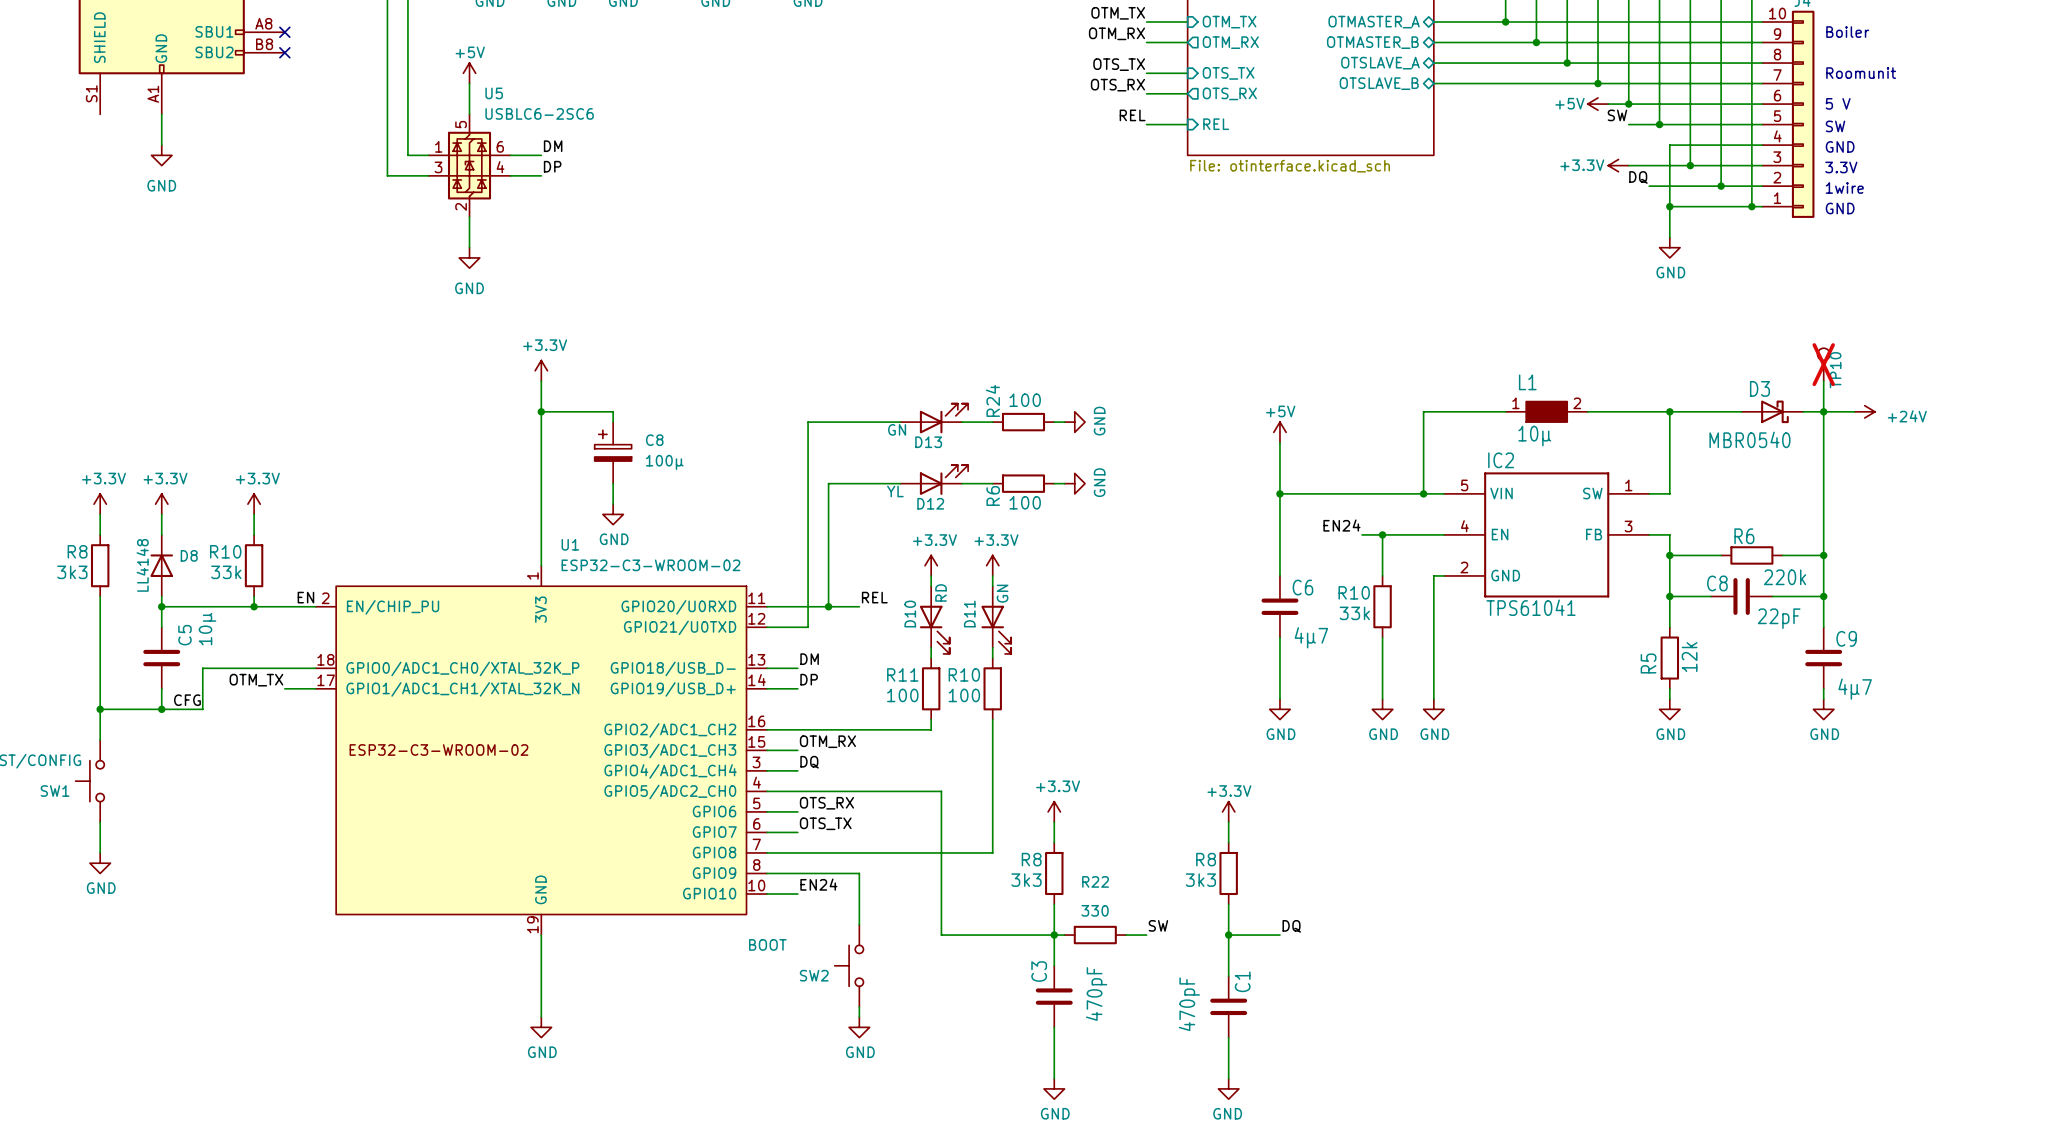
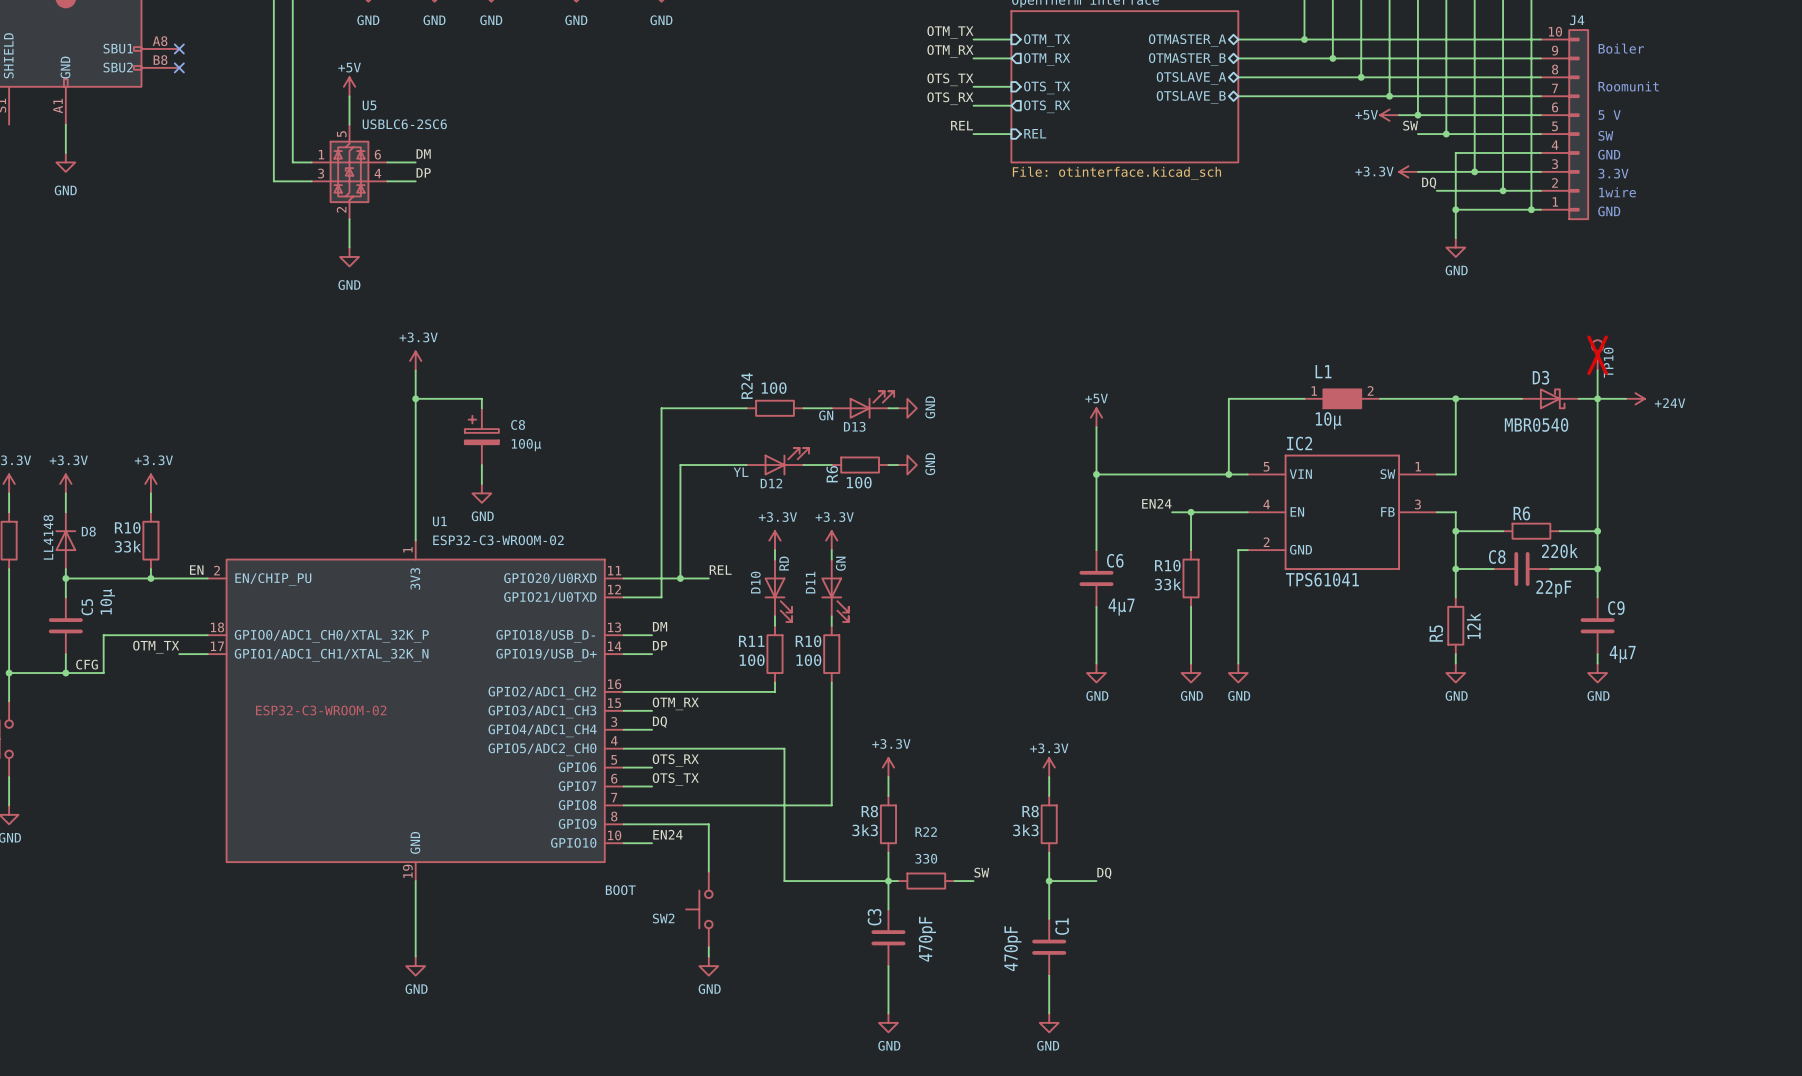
D13 position: (934, 418) -> (862, 404)
R24 position: (1023, 422) -> (774, 408)

